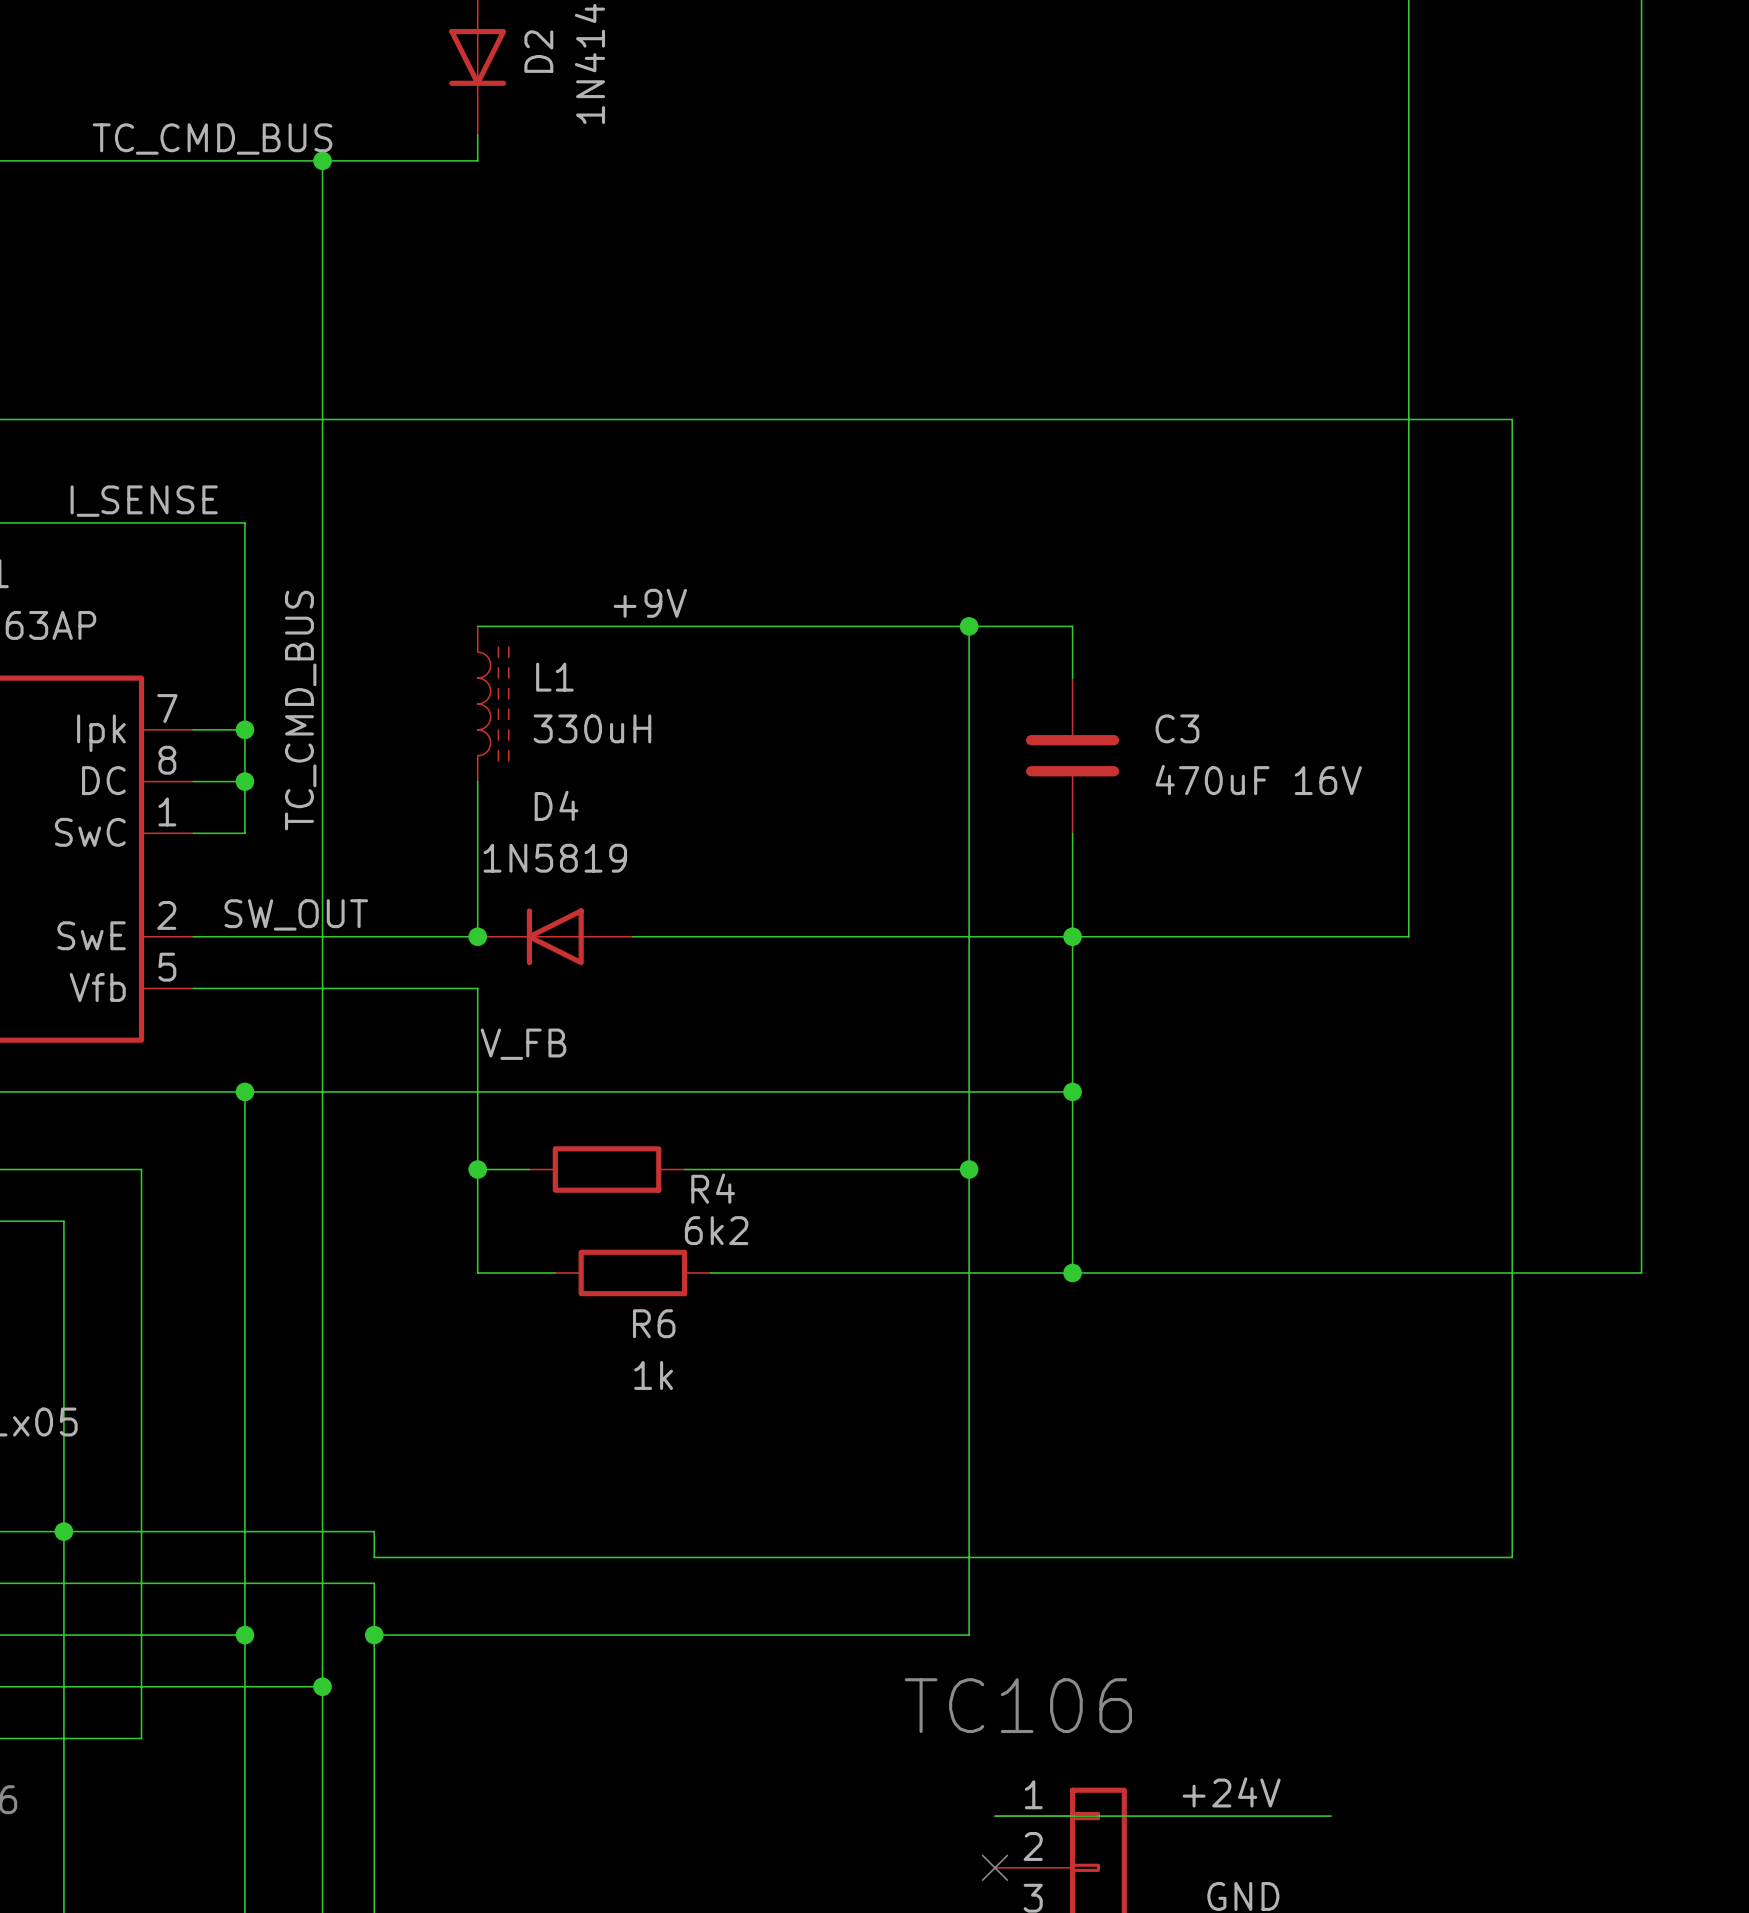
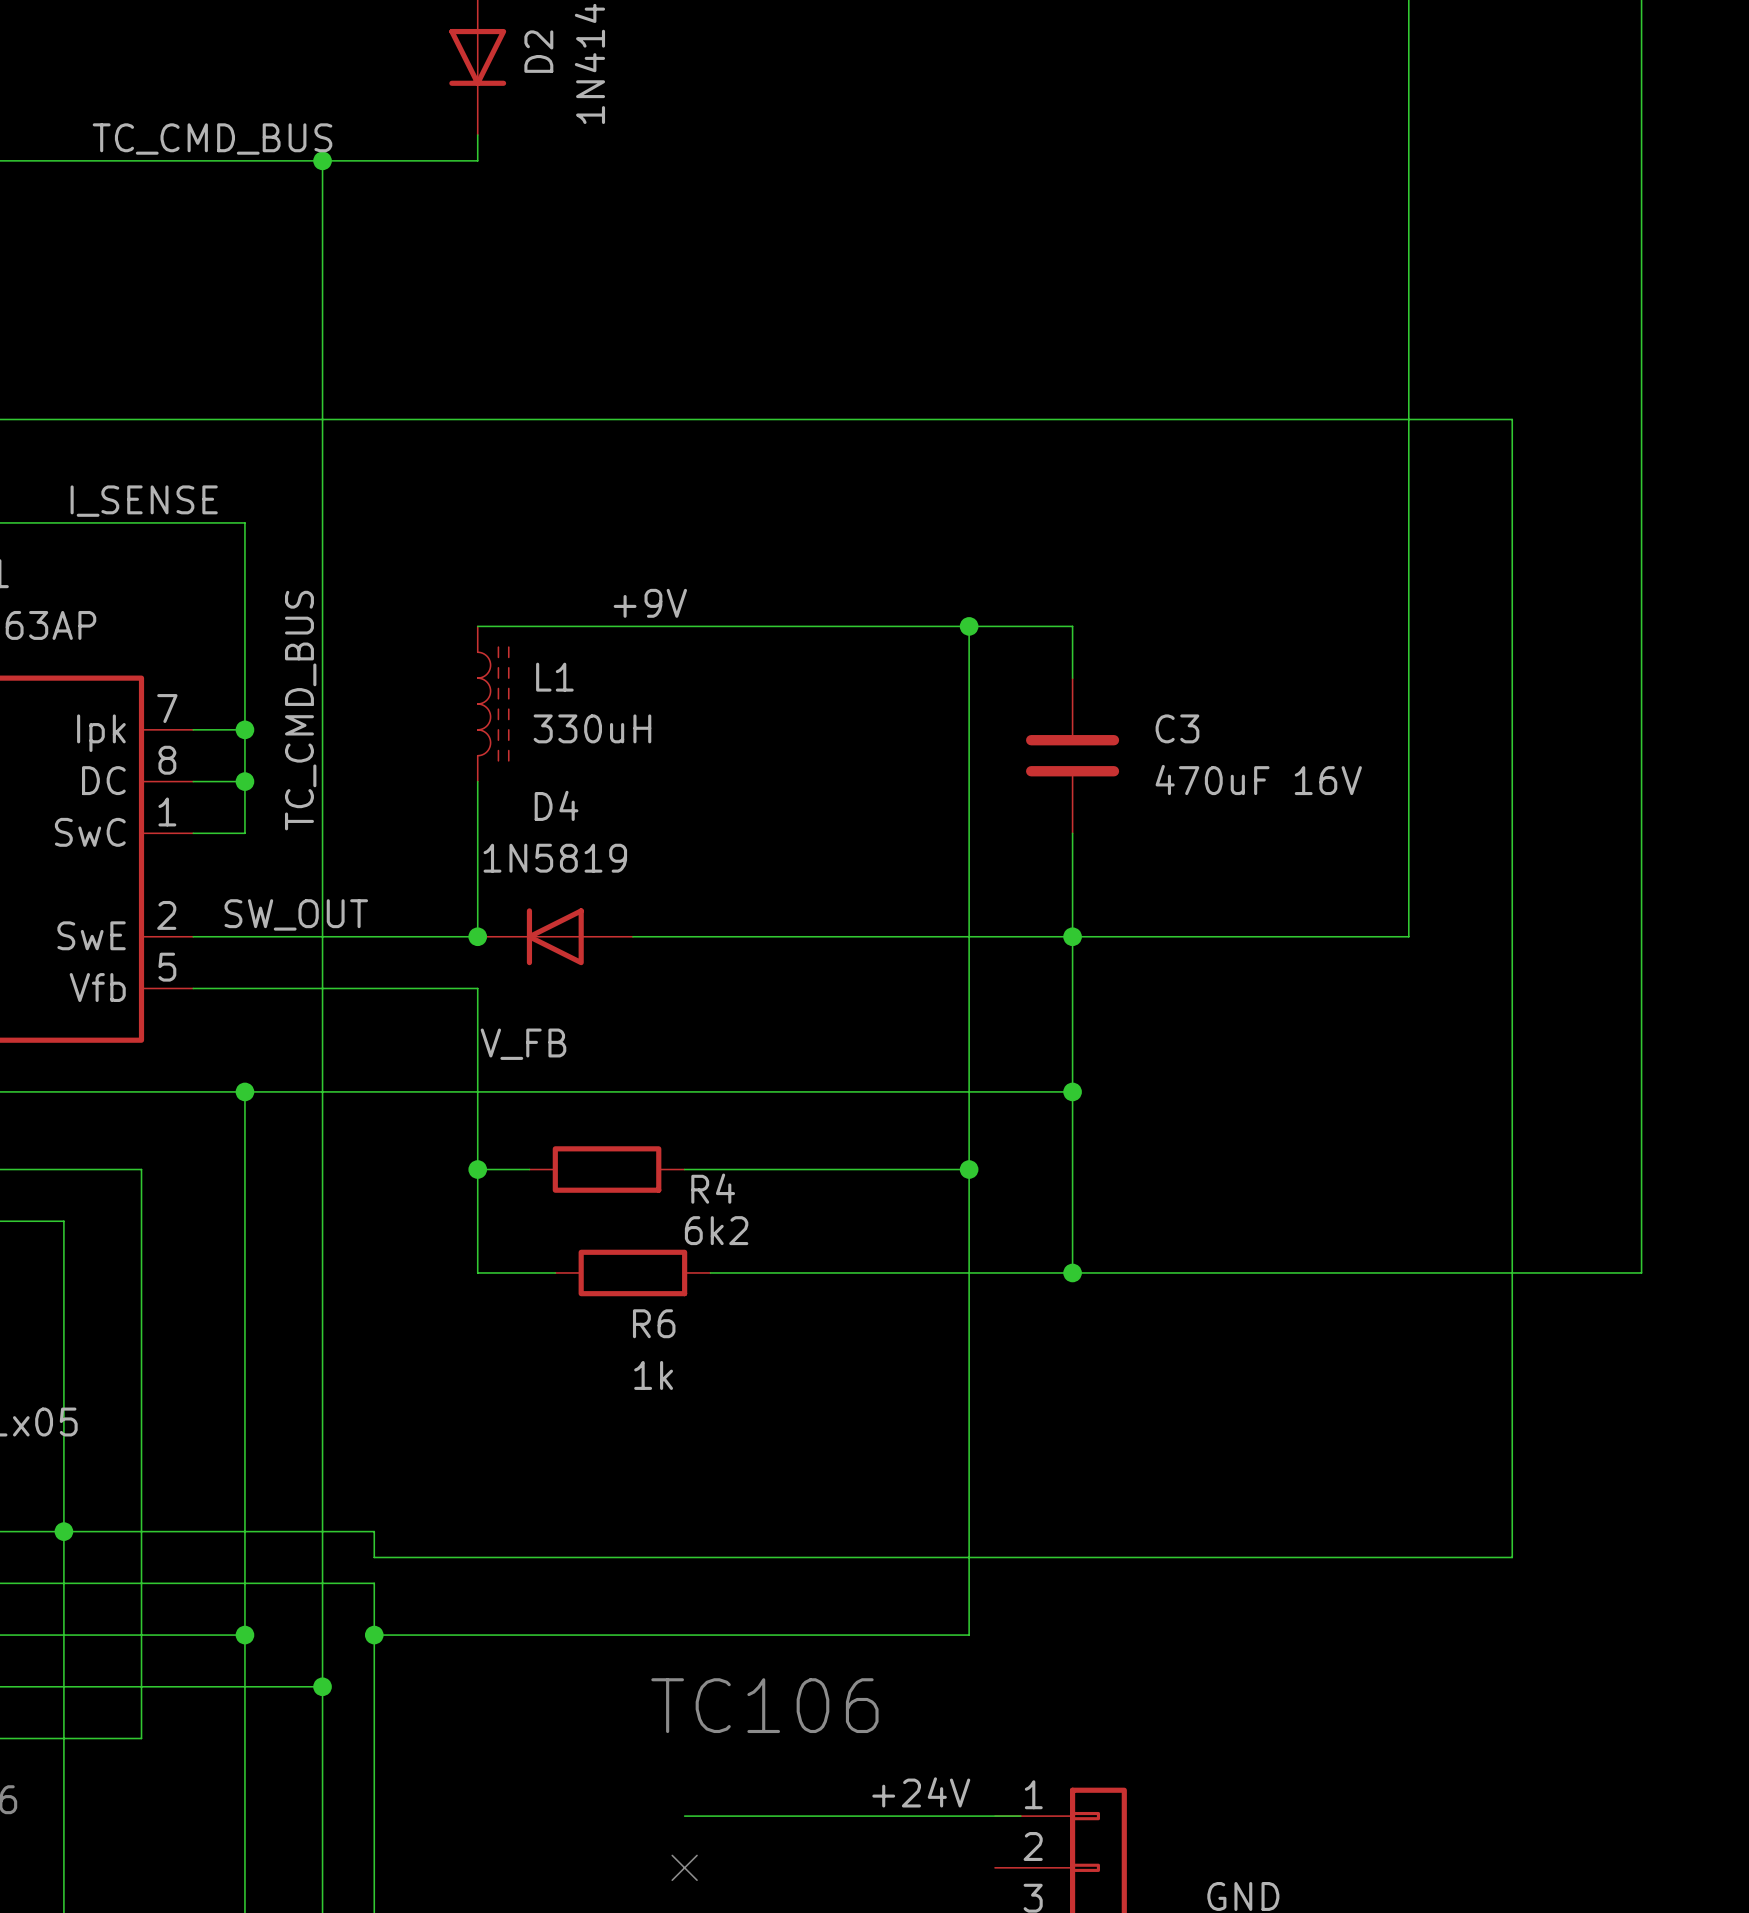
text position: TC106 (1018, 1705) -> TC106 (764, 1705)
label position: +24V (1231, 1792) -> +24V (921, 1792)
wire: (1020, 1816) (1331, 1816) -> (684, 1816) (994, 1816)
no-connect mark: none -> (684, 1867)
no-connect mark: (994, 1867) -> none

